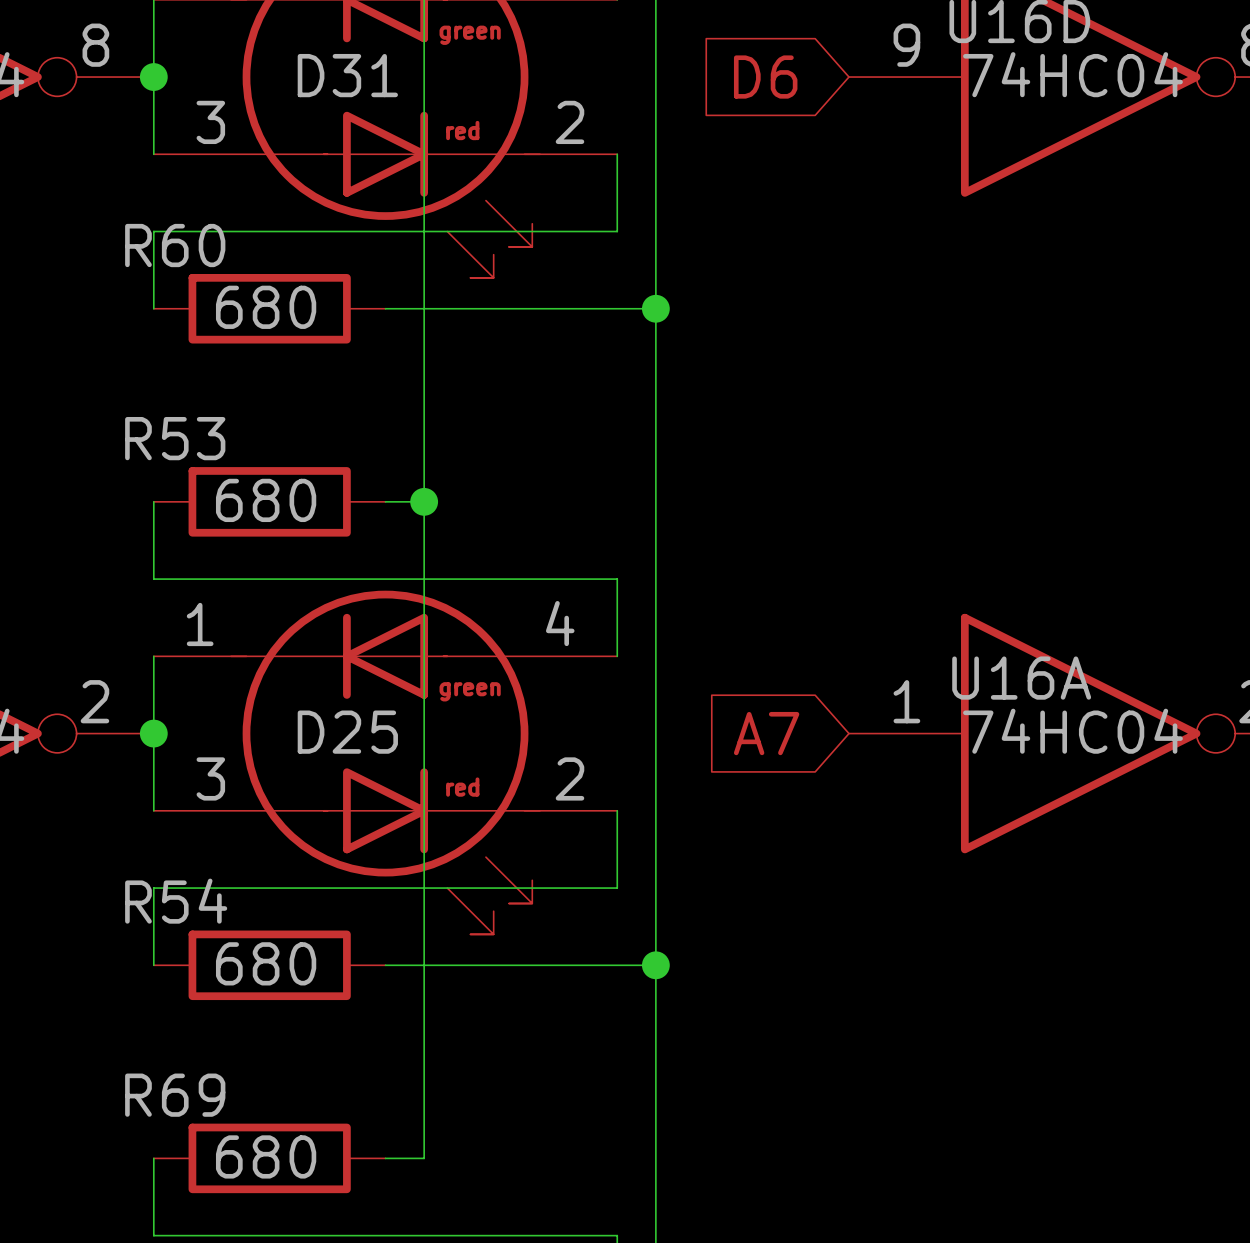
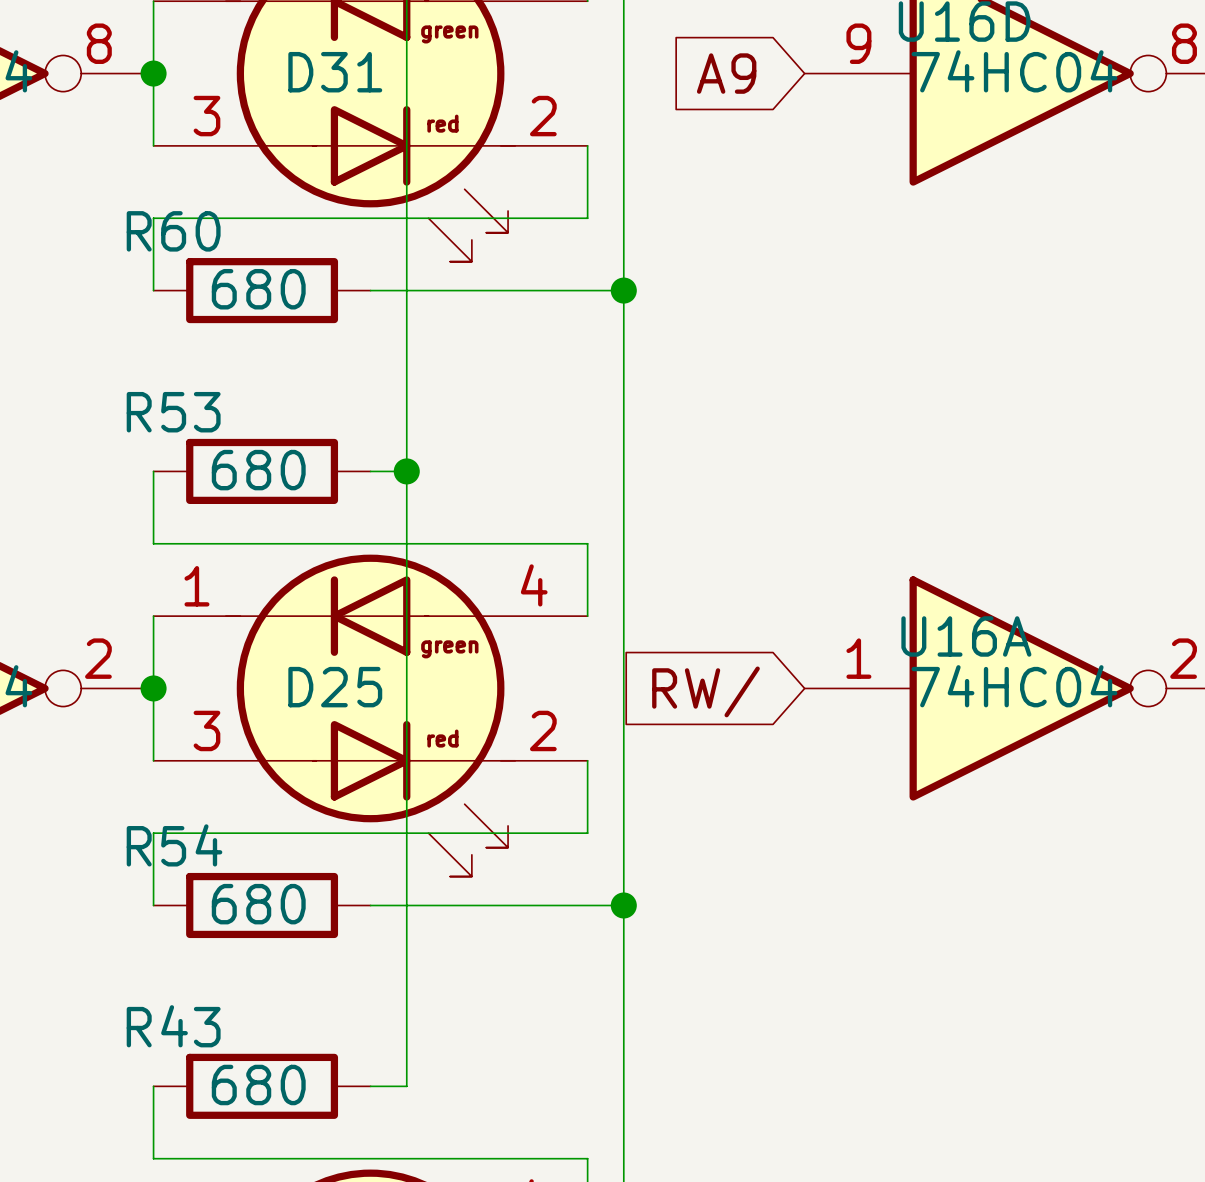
global label: D6 (765, 77) -> A9 (726, 73)
global label: A7 (766, 733) -> RW/ (705, 691)
R69 name: R69 (175, 1095) -> R43 (173, 1026)

